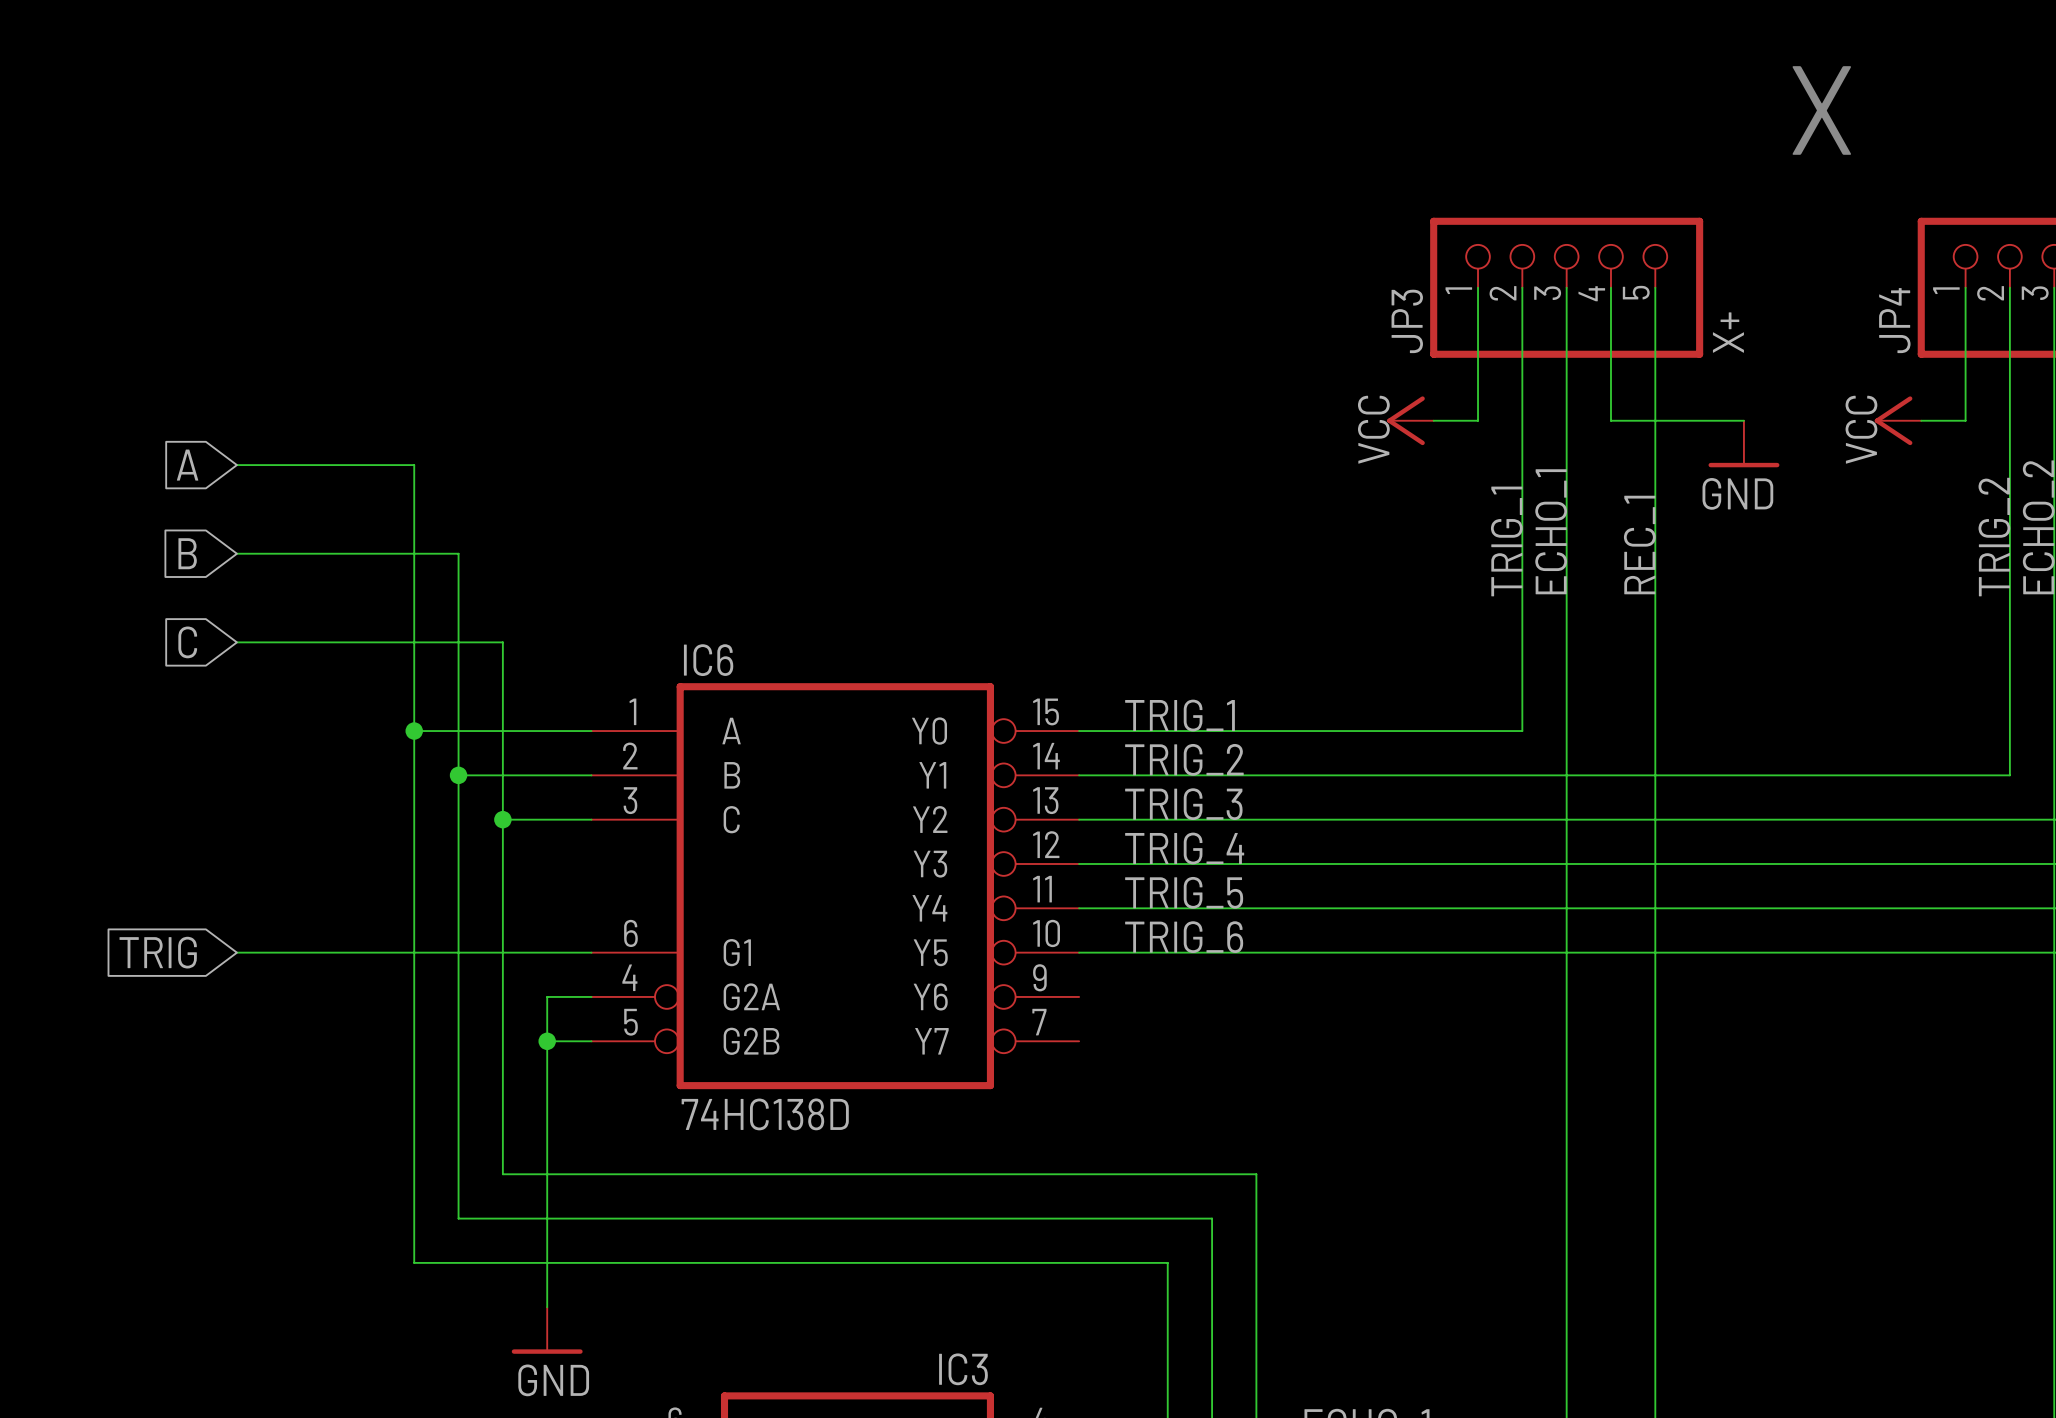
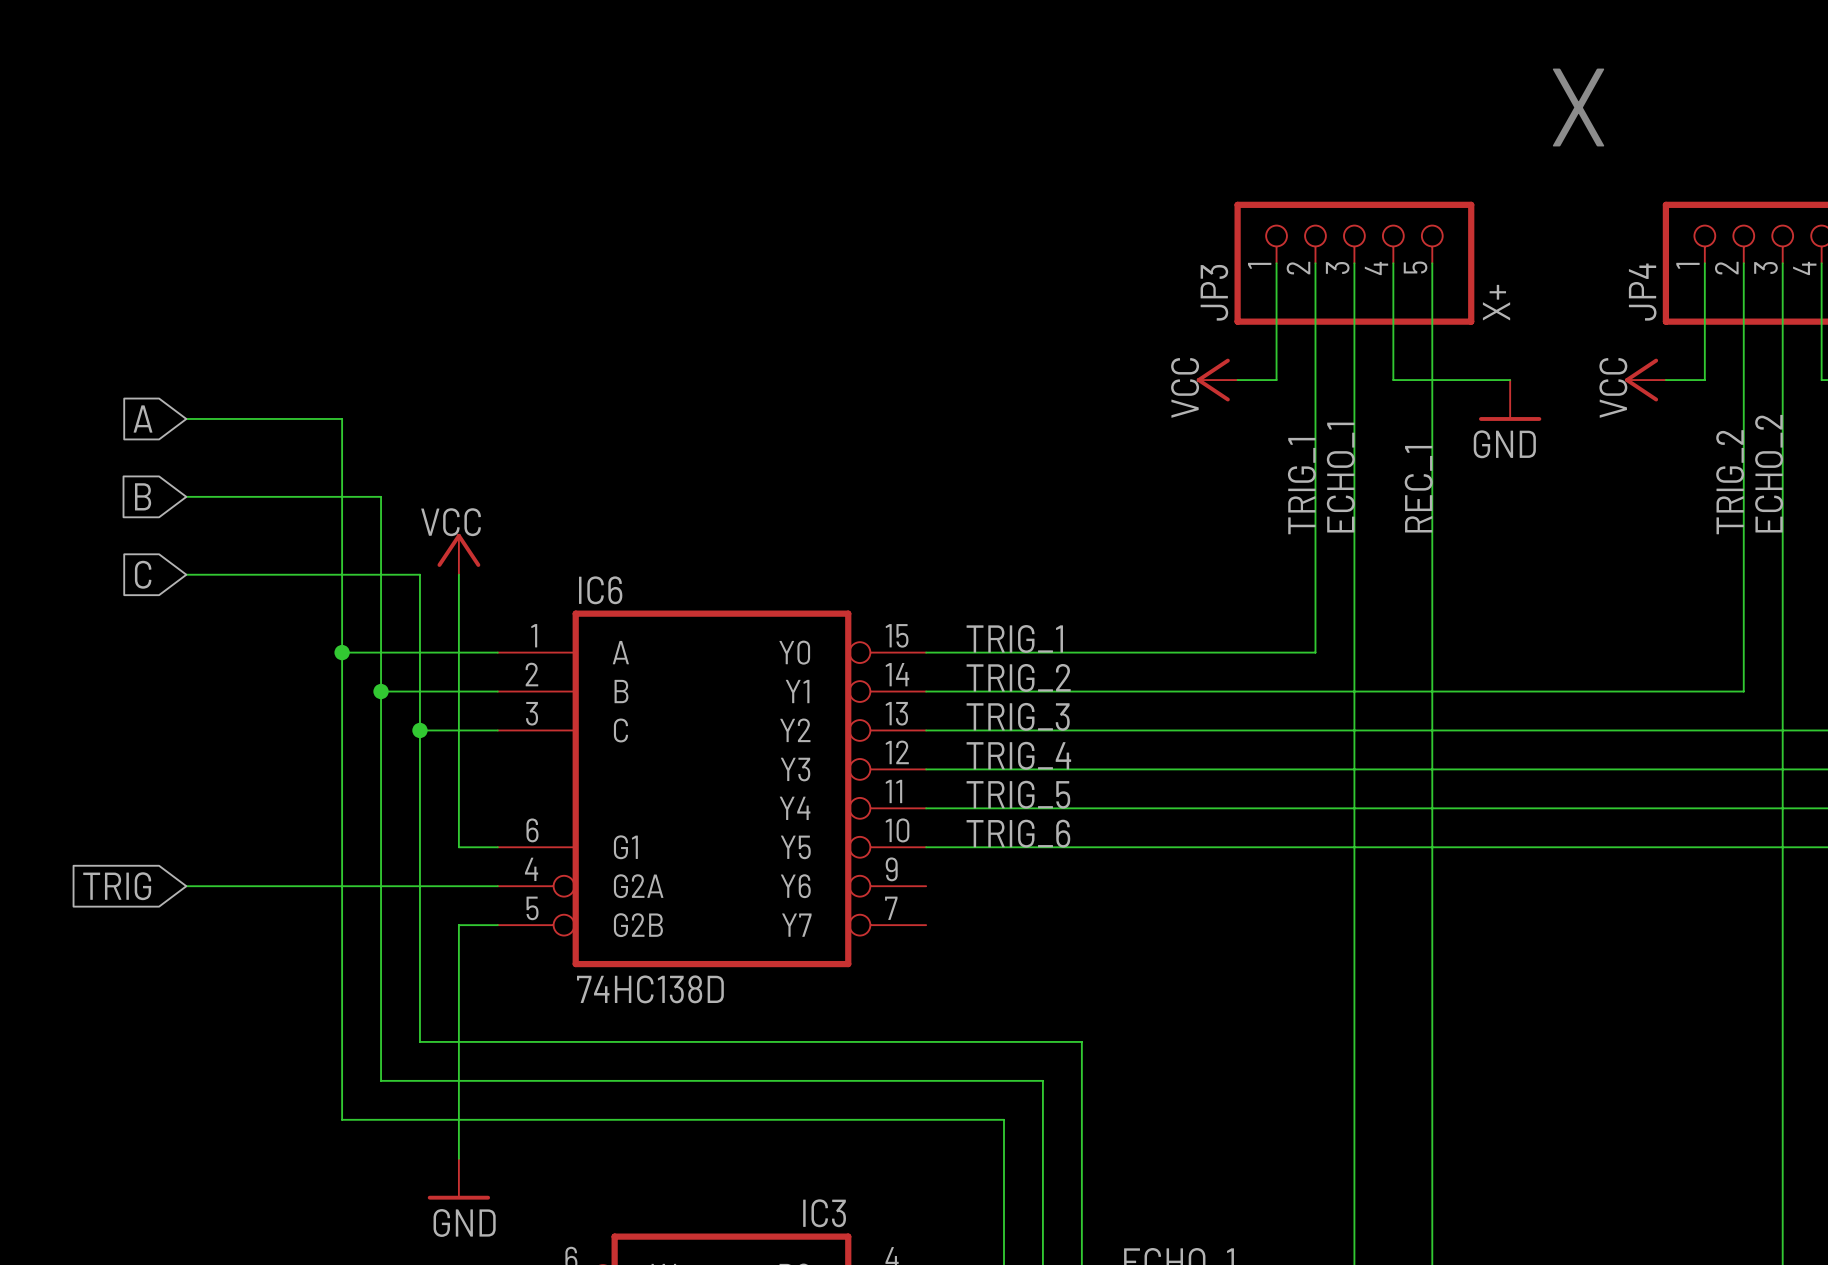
power symbol: none -> VCC (458, 554)
global label position: TRIG (158, 952) -> TRIG (117, 886)
wire: (236, 952) (547, 952) -> (458, 574) (458, 847)
wire: (547, 996) (547, 1041) -> (458, 886) (186, 886)
junction: (547, 1041) -> none

